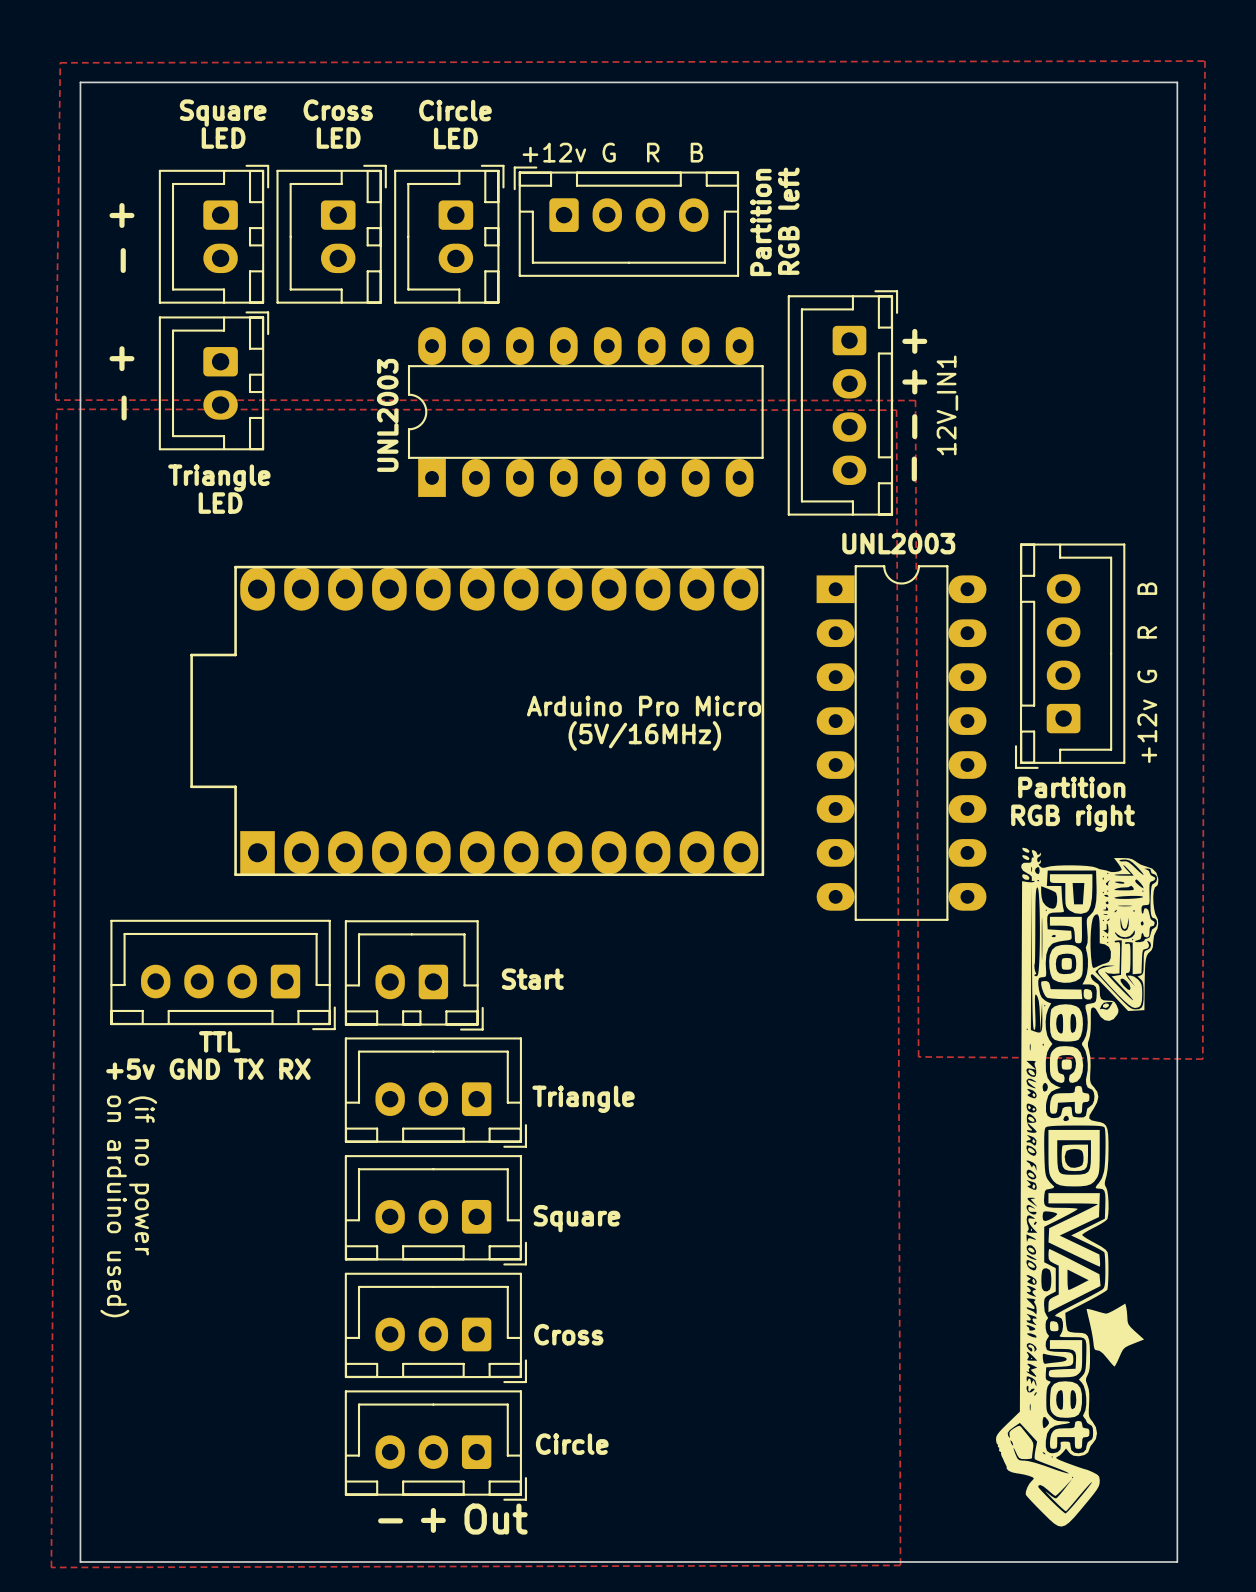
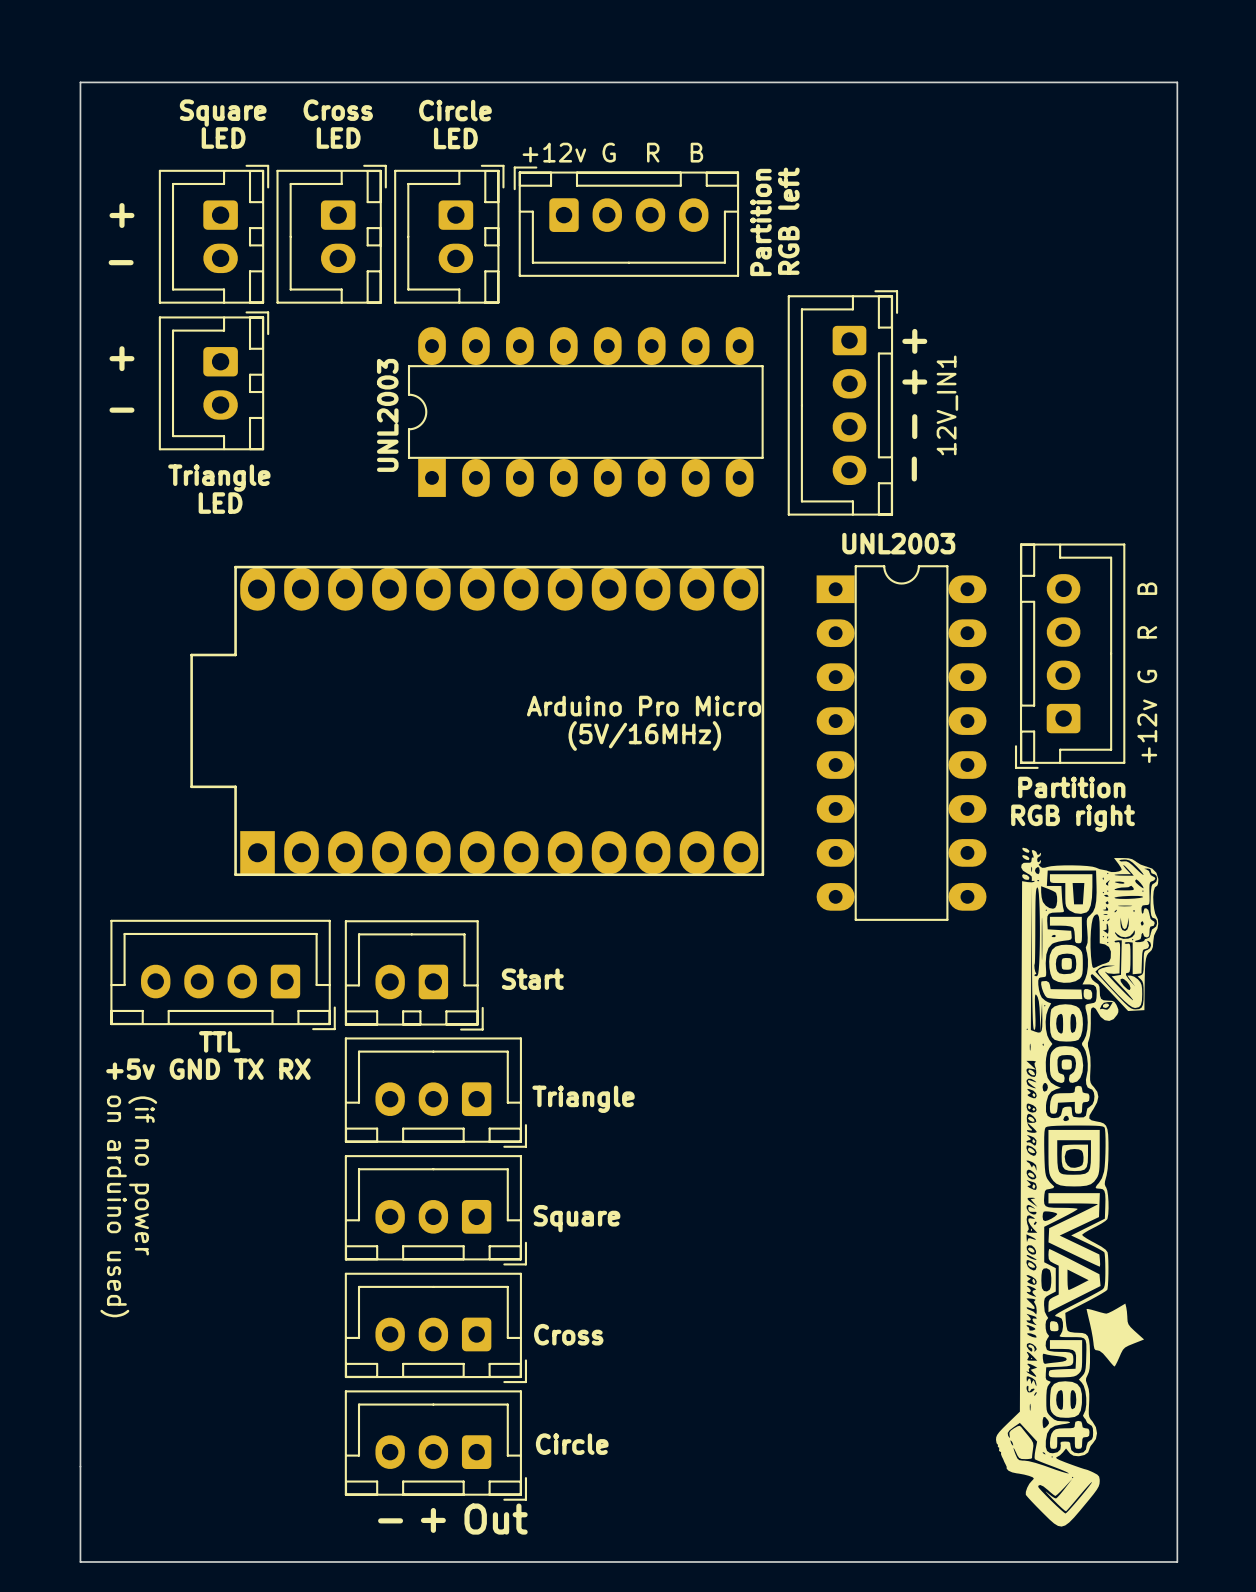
zone outline: (1204, 61) (60, 62) (55, 400) (915, 400) (918, 1056) (1202, 1059) (1204, 61) -> none
text rotation: 0° (123, 260) -> 90° clockwise (121, 262)
text rotation: 0° (124, 408) -> 90° clockwise (121, 410)
zone outline: (56, 409) (896, 410) (900, 1565) (51, 1567) (56, 409) -> none

